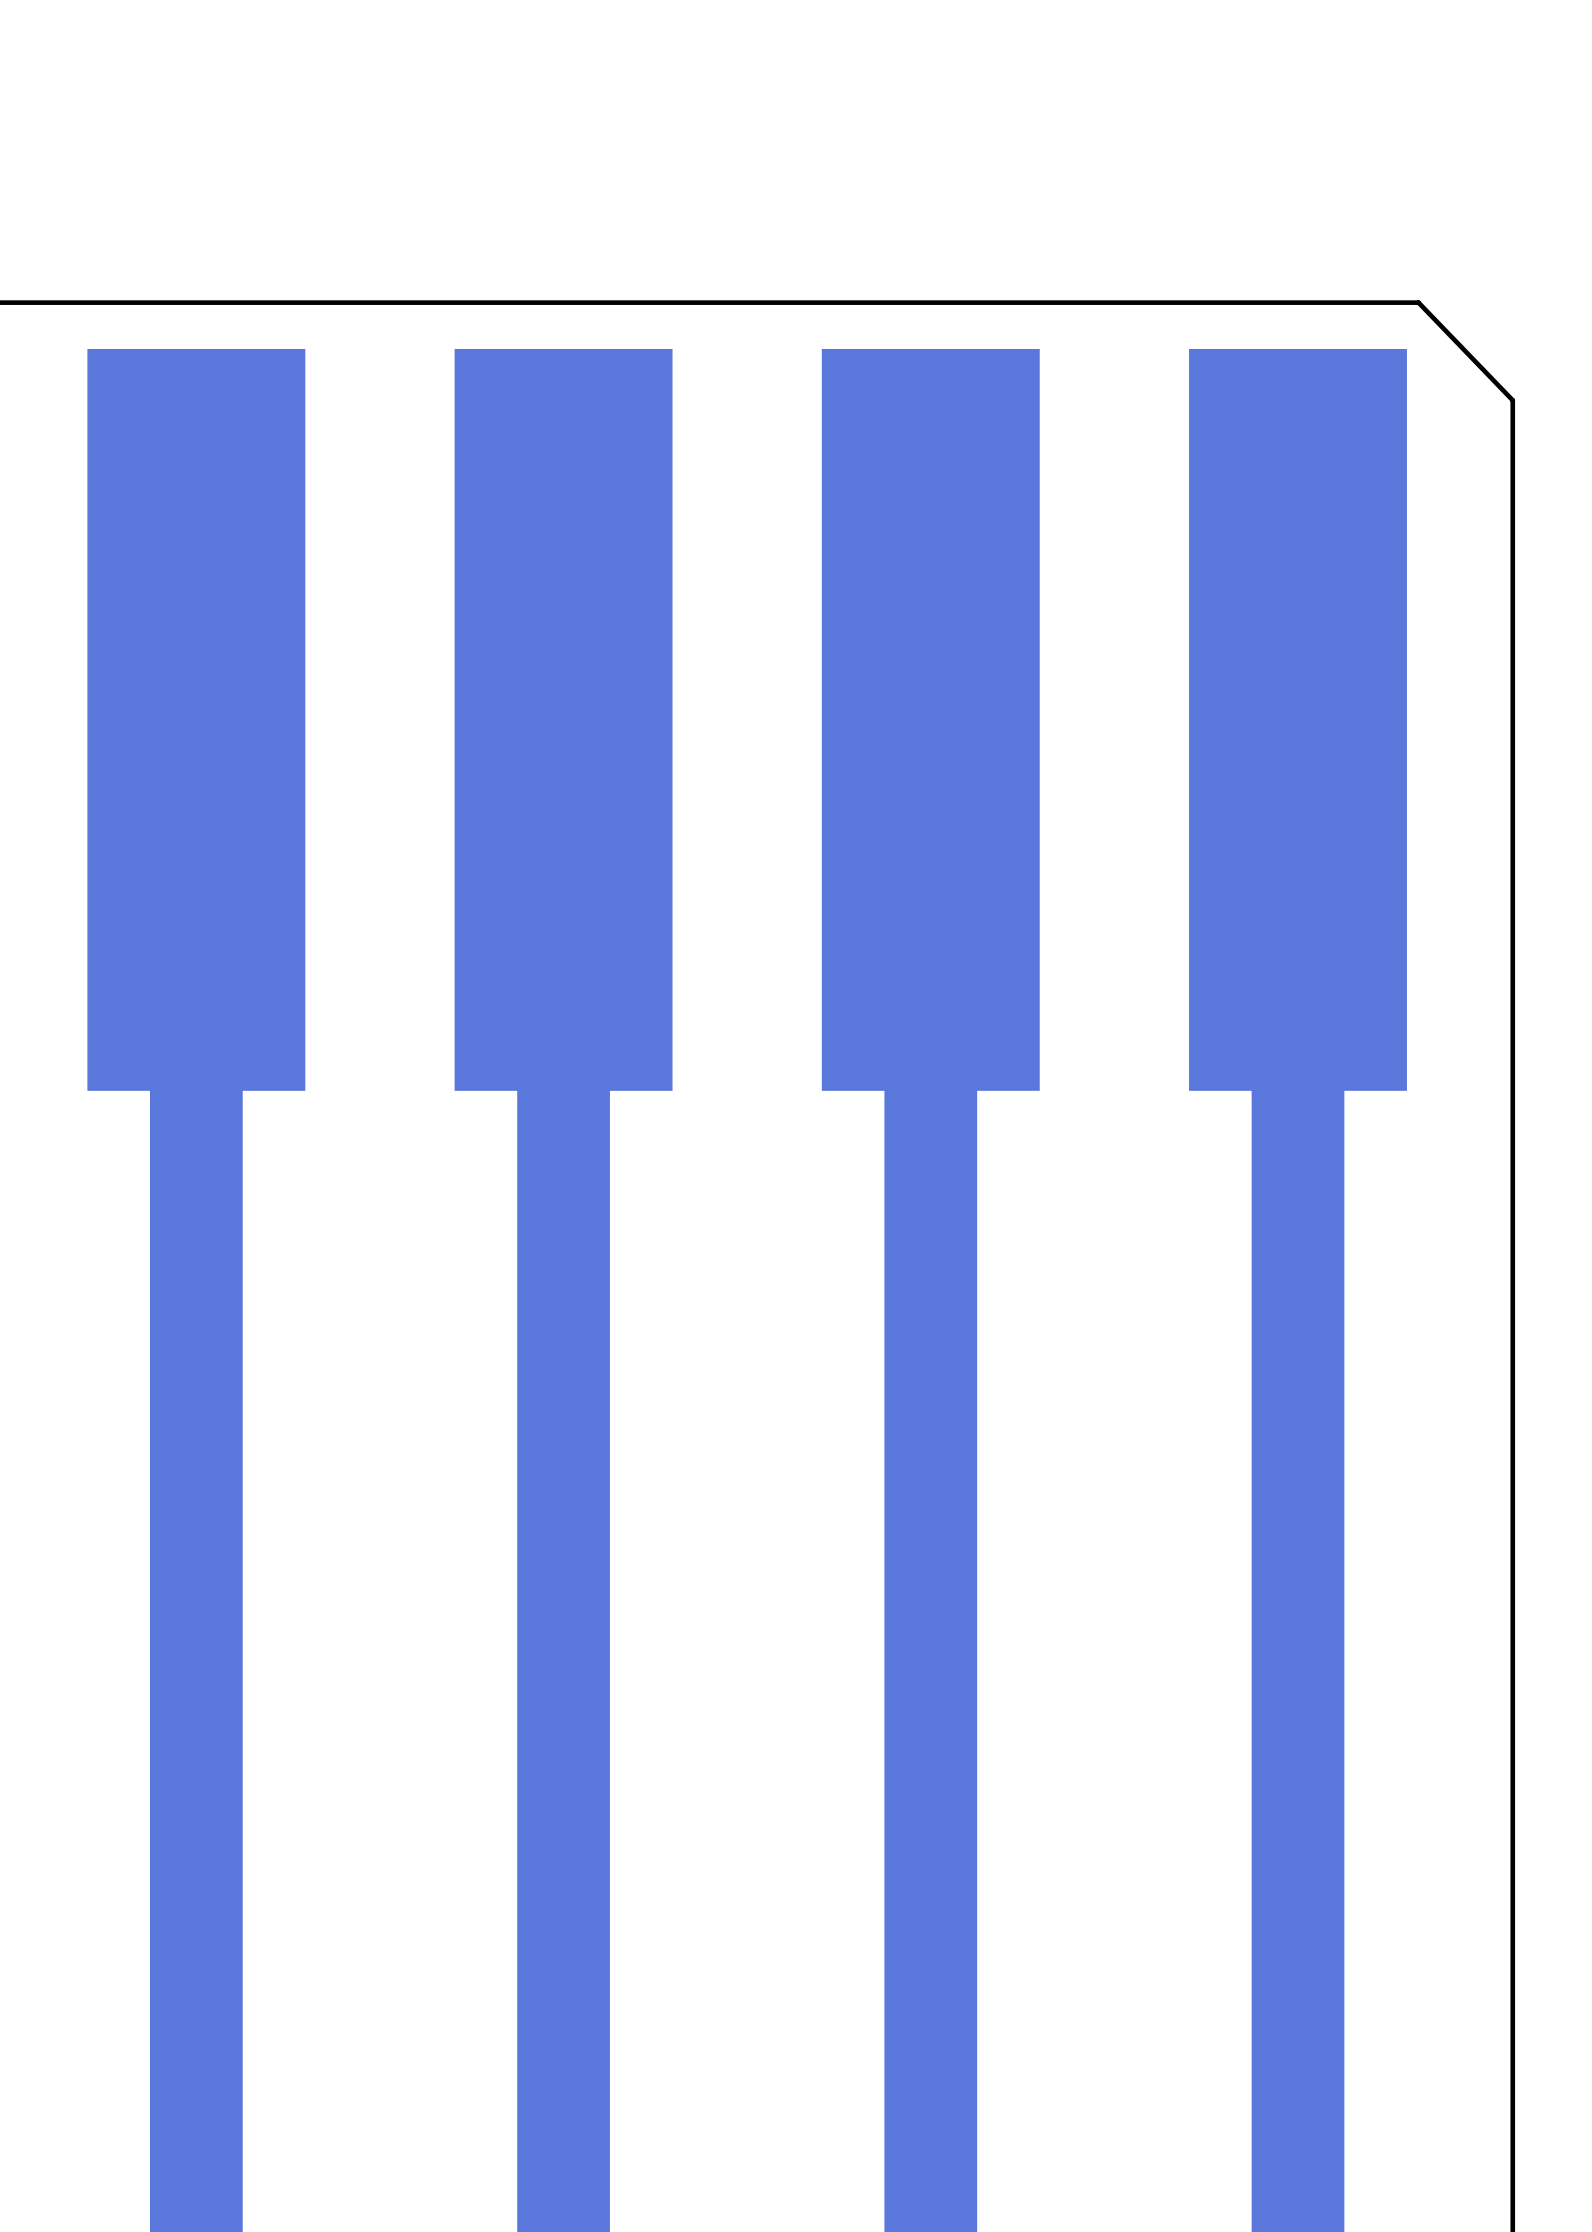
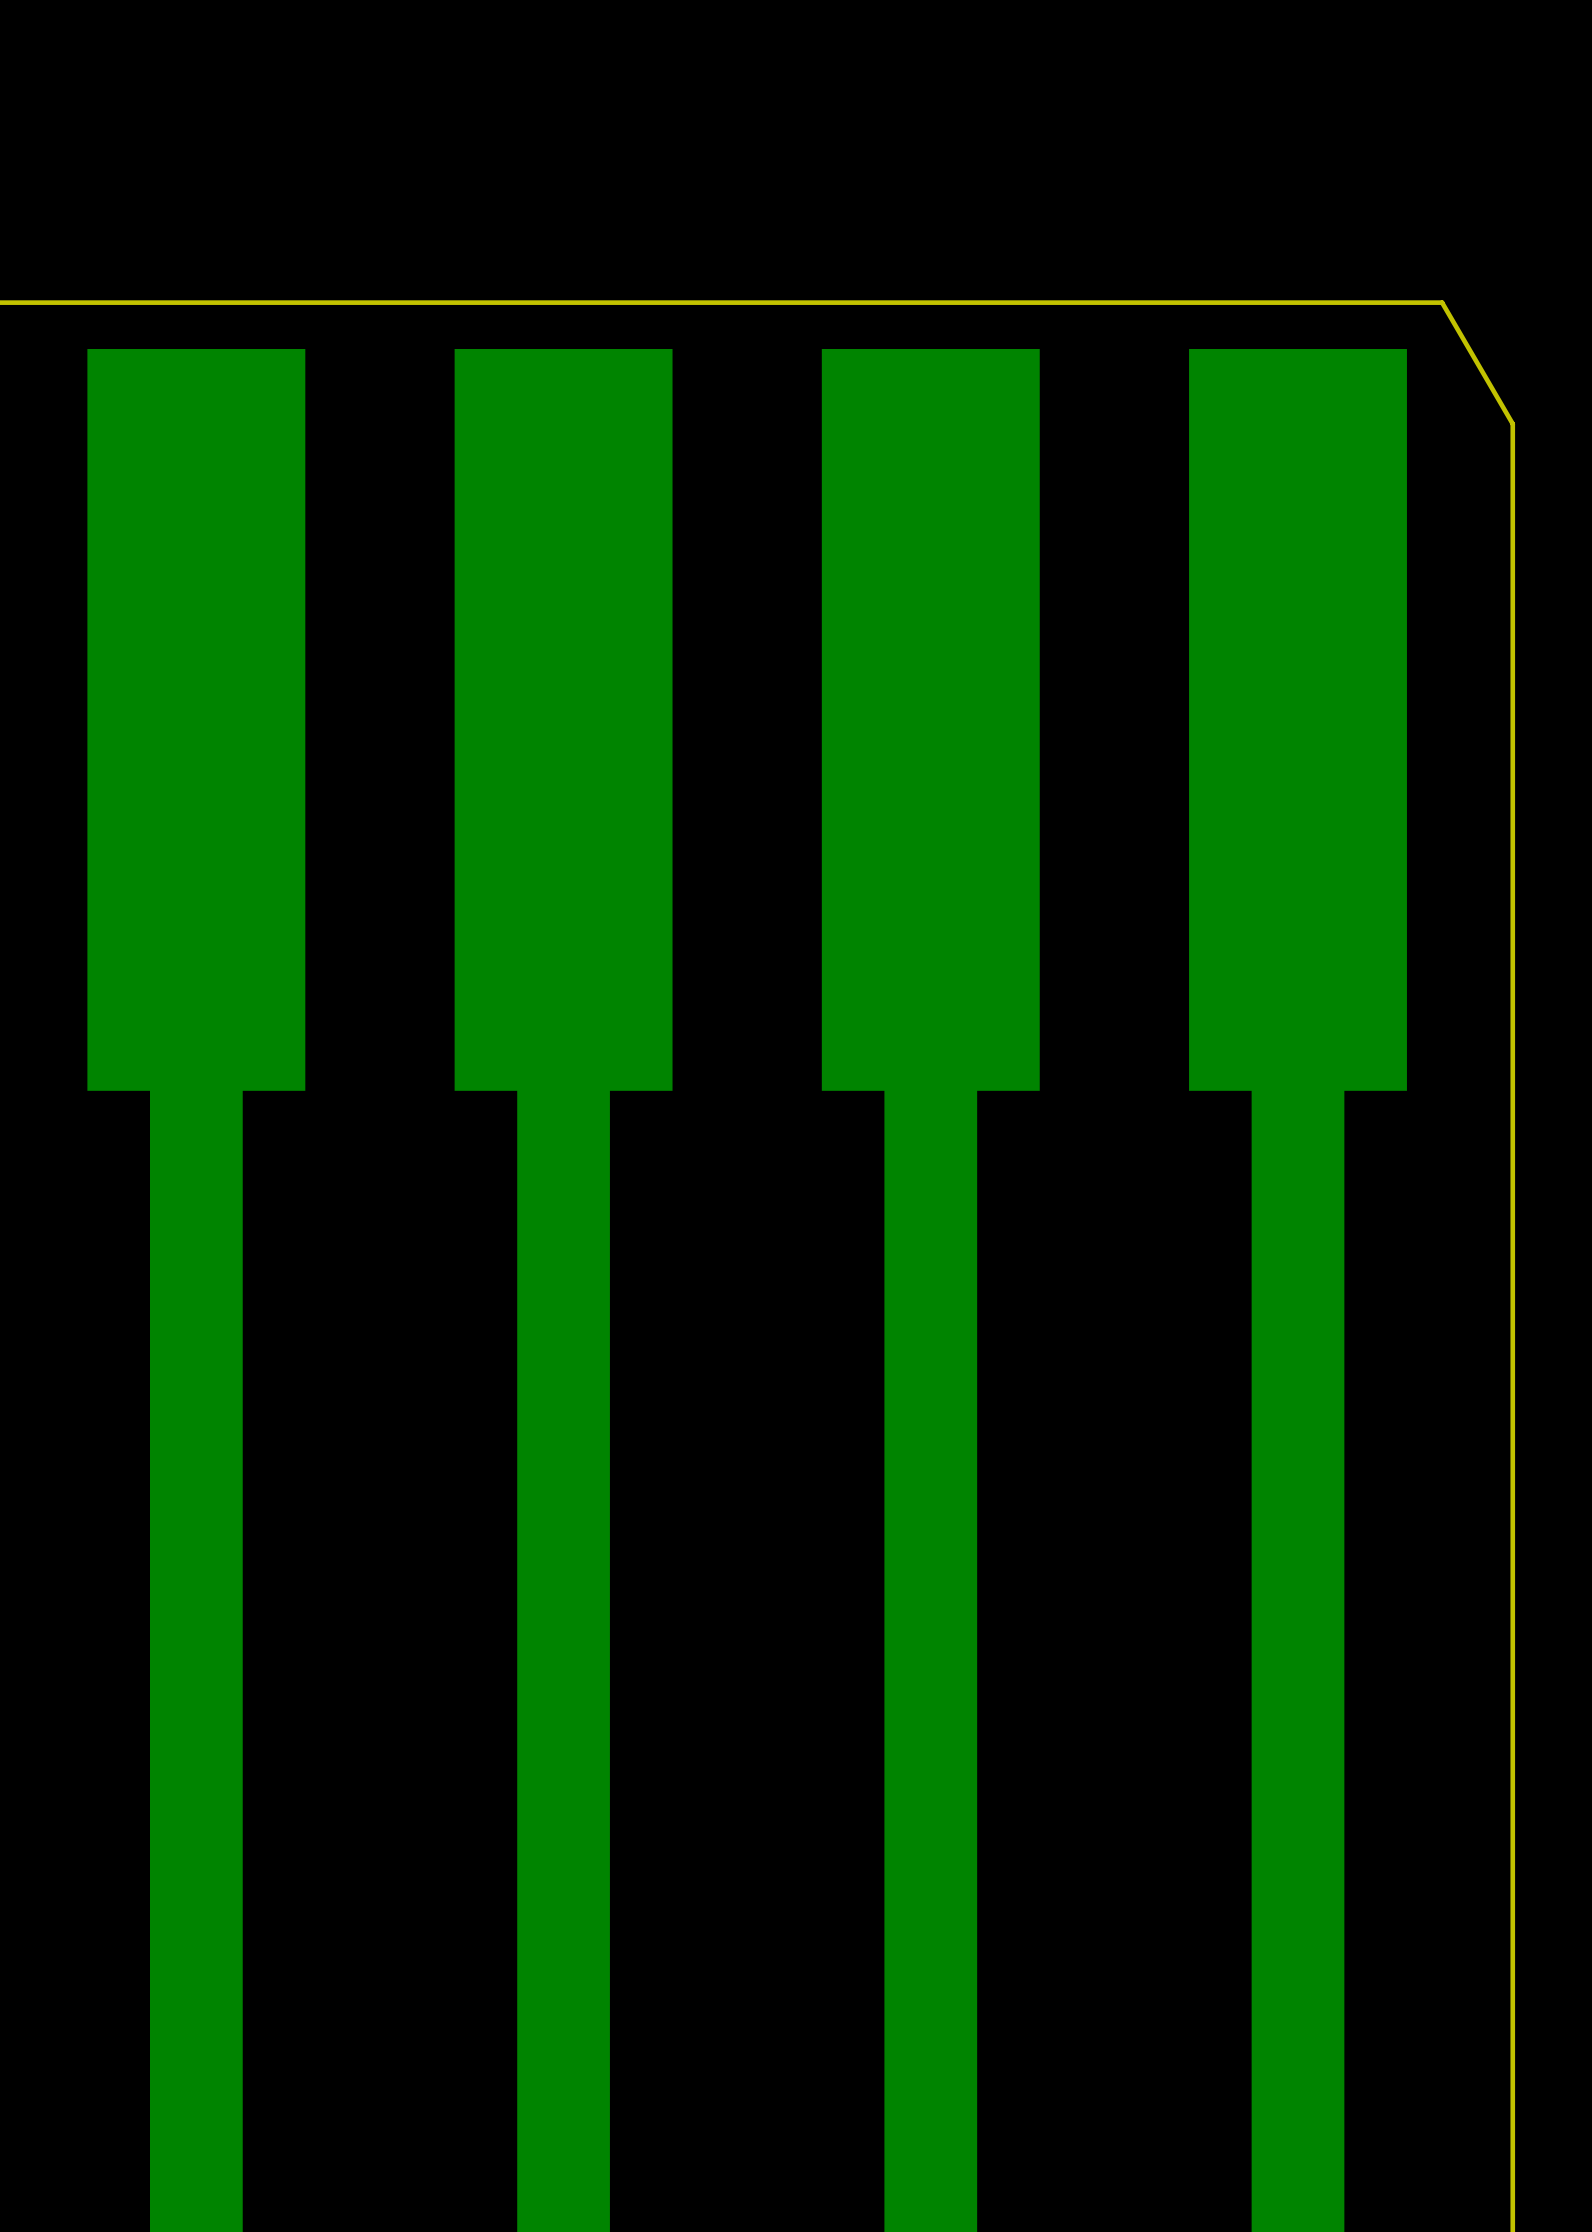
board edge: (1418, 302) (1512, 400) (1512, 423) -> (1418, 302) (1442, 302) (1512, 423)

